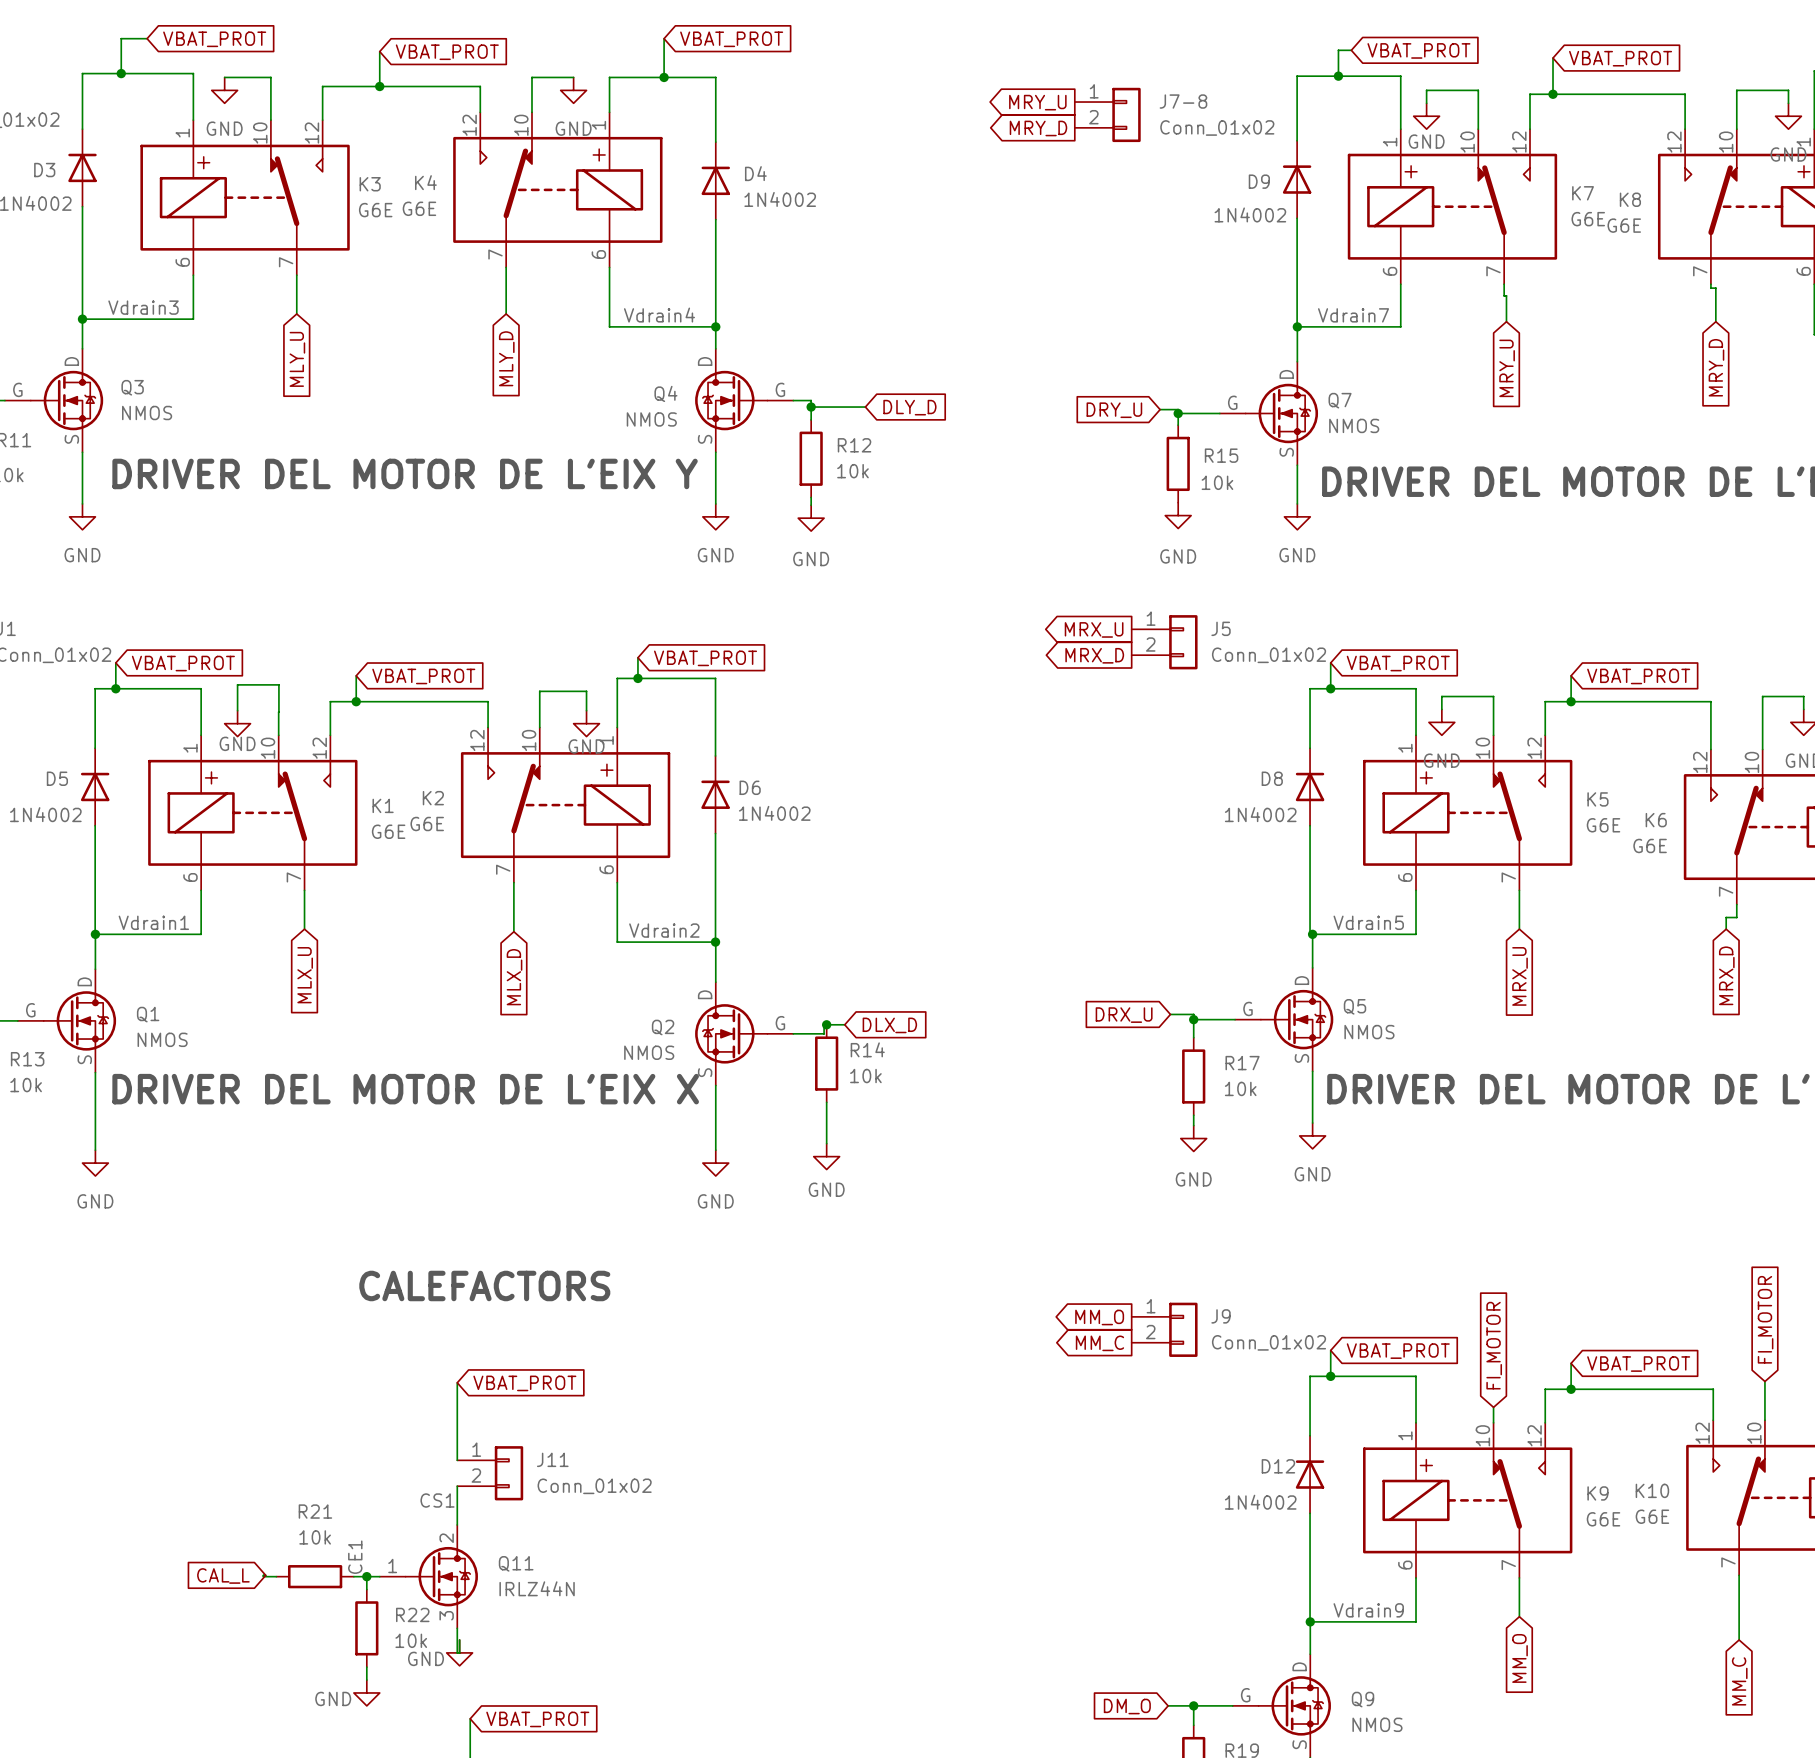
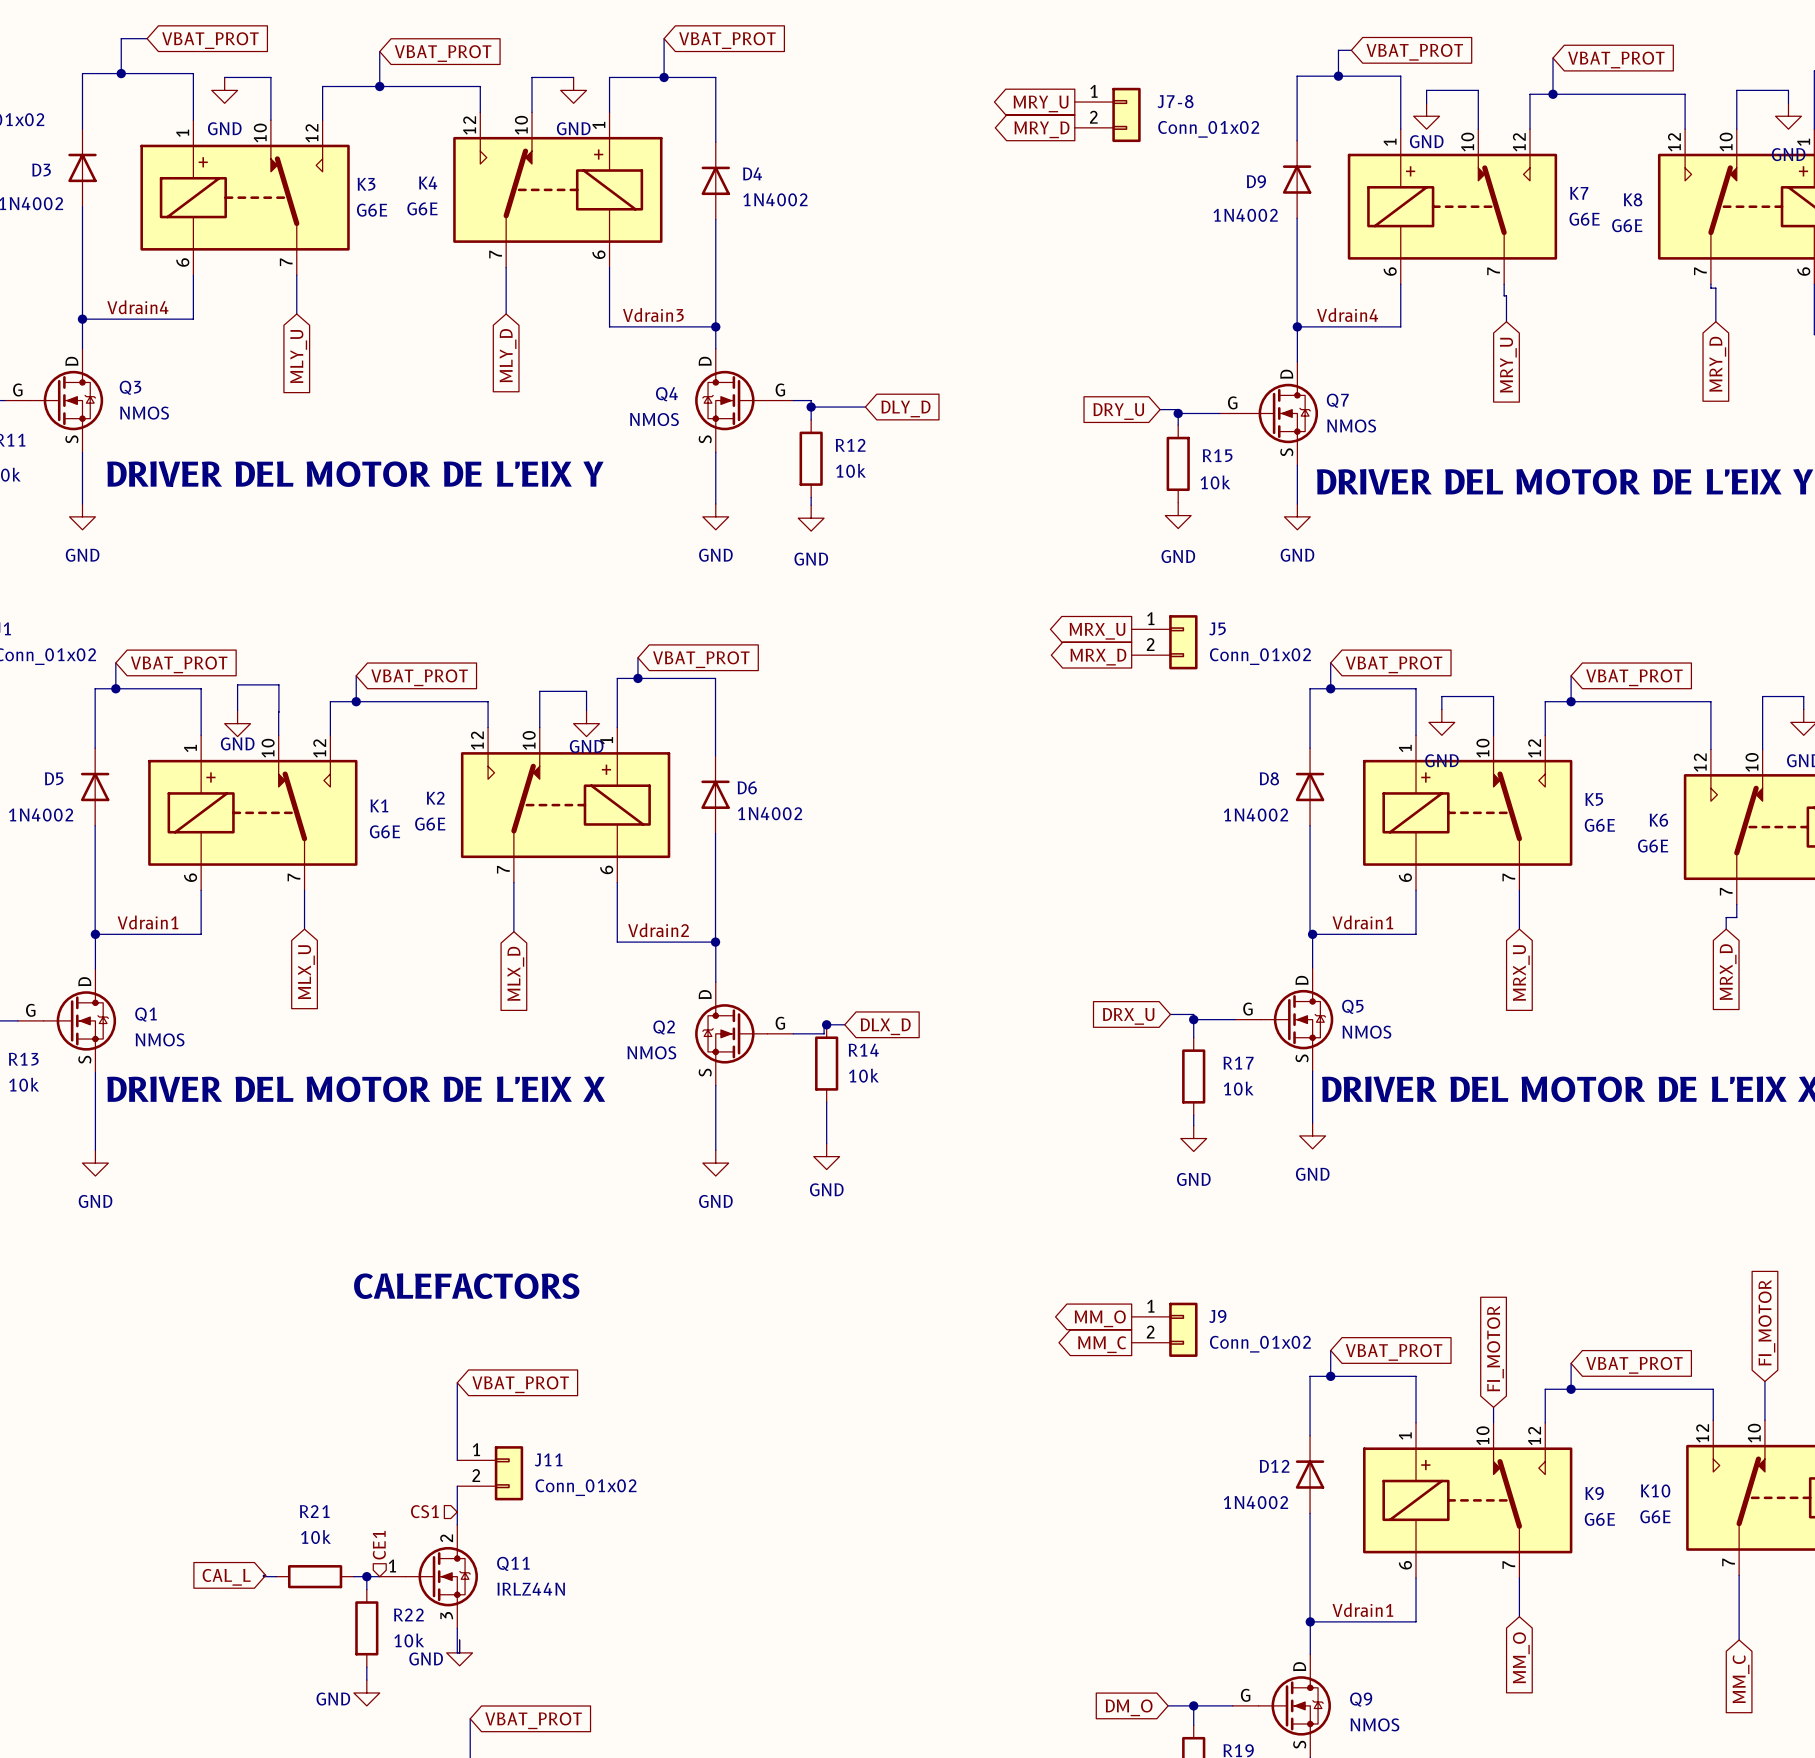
label: Vdrain3 (143, 307) -> Vdrain4 (137, 307)
label: Vdrain4 (659, 315) -> Vdrain3 (653, 315)
label: Vdrain7 (1353, 315) -> Vdrain4 (1347, 315)
label: Vdrain5 (1368, 922) -> Vdrain1 (1362, 922)
label: CS1 (437, 1500) -> none
hierarchical label: none -> CS1 (424, 1511)
hierarchical label: none -> CE1 (379, 1545)
label: CE1 (355, 1557) -> none
label: Vdrain9 (1368, 1610) -> Vdrain1 (1362, 1610)

